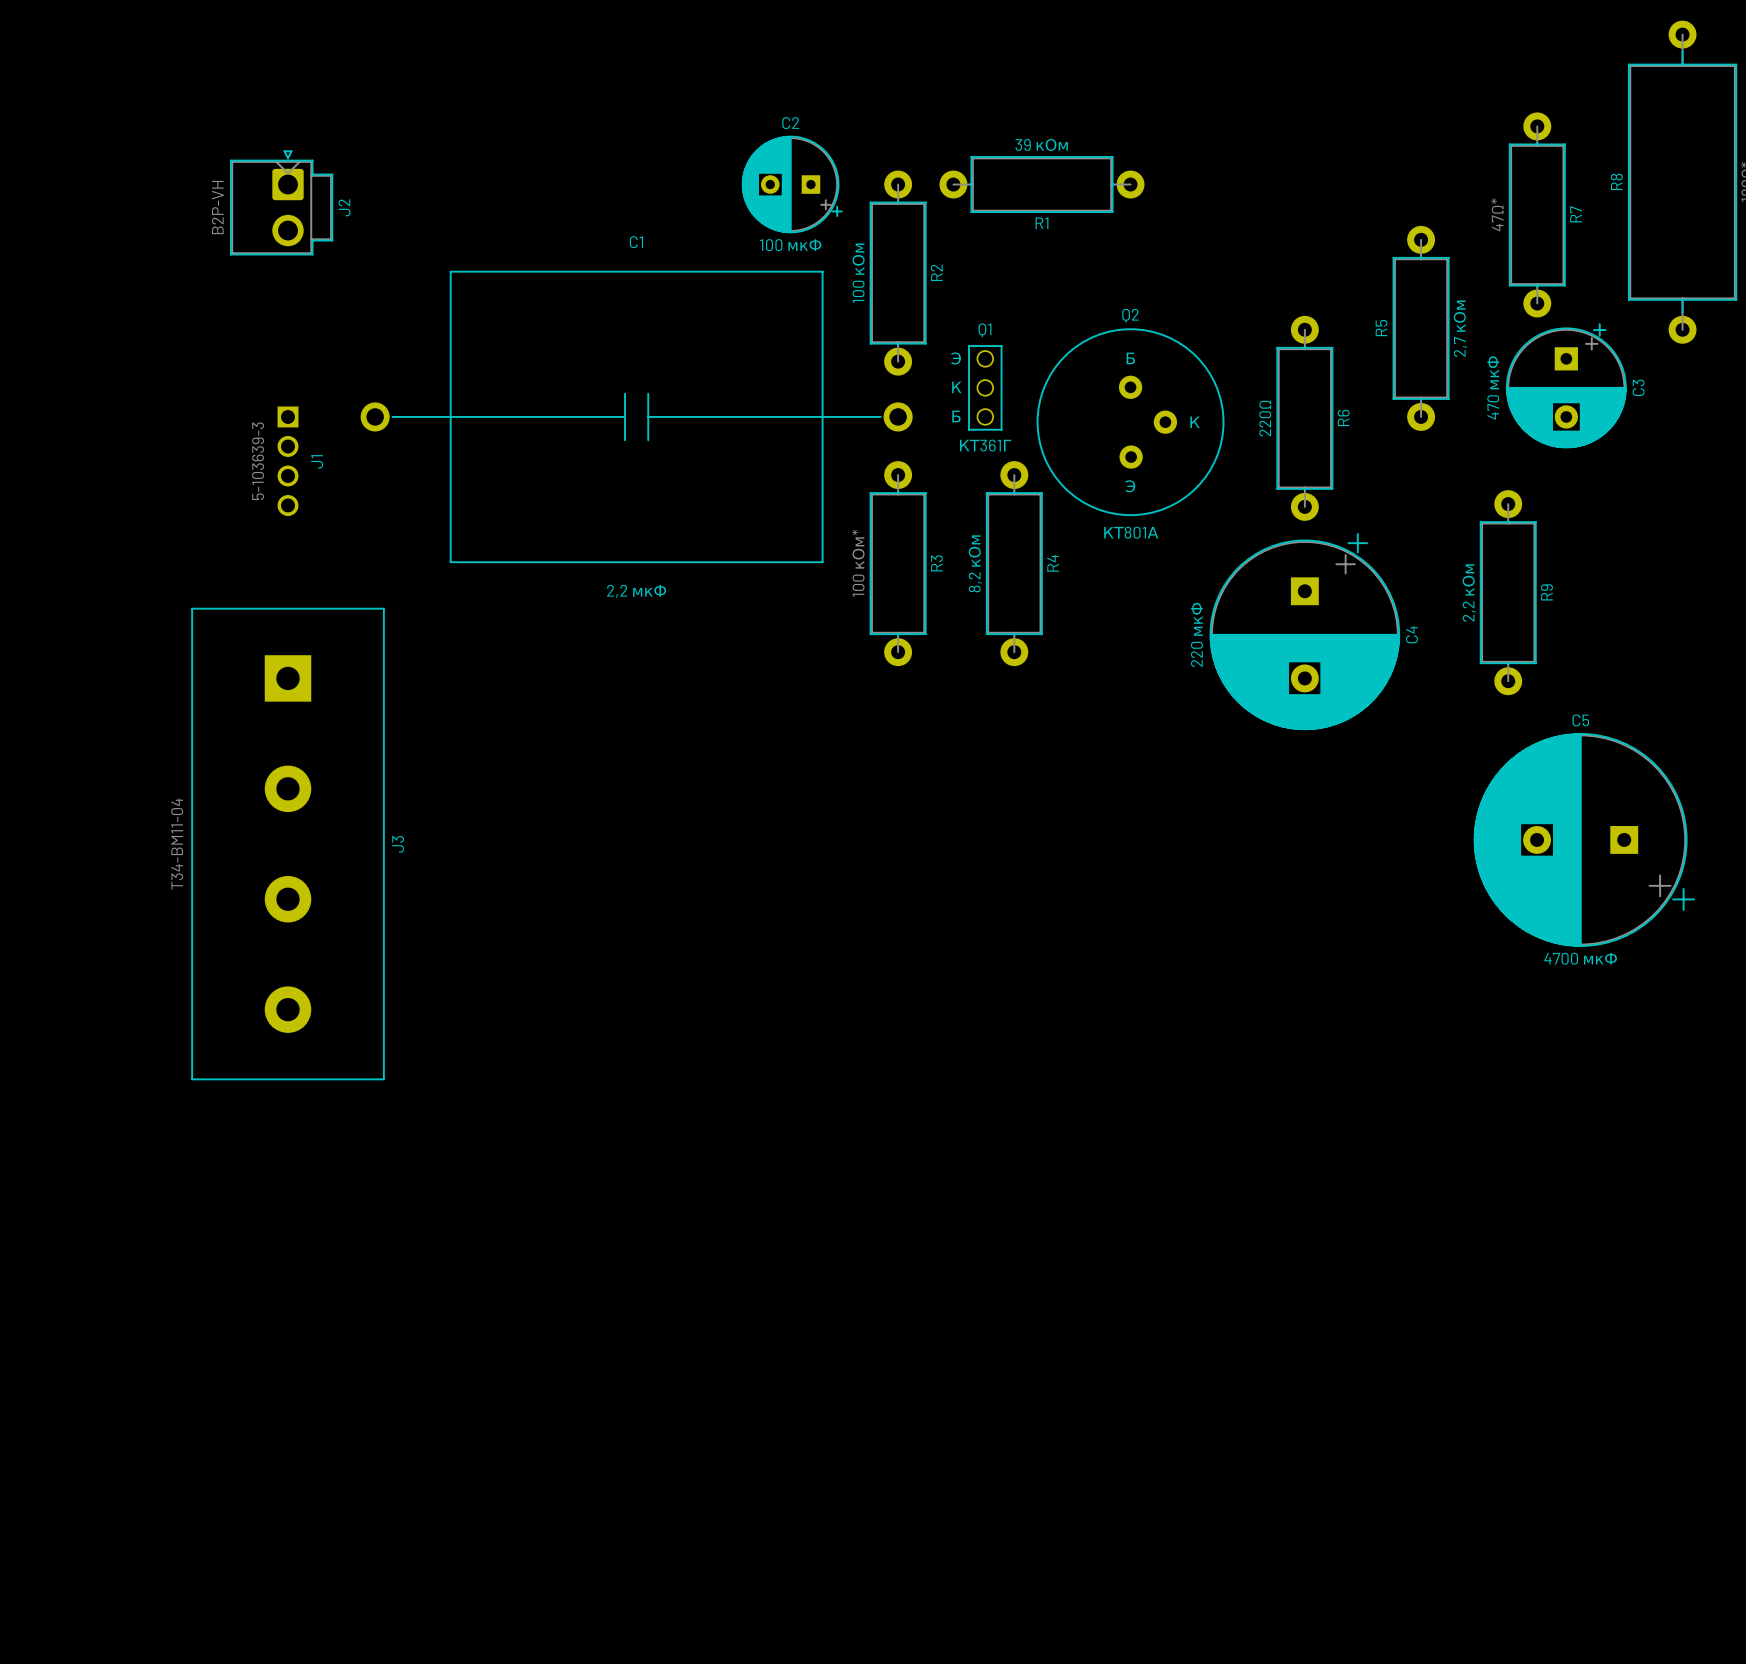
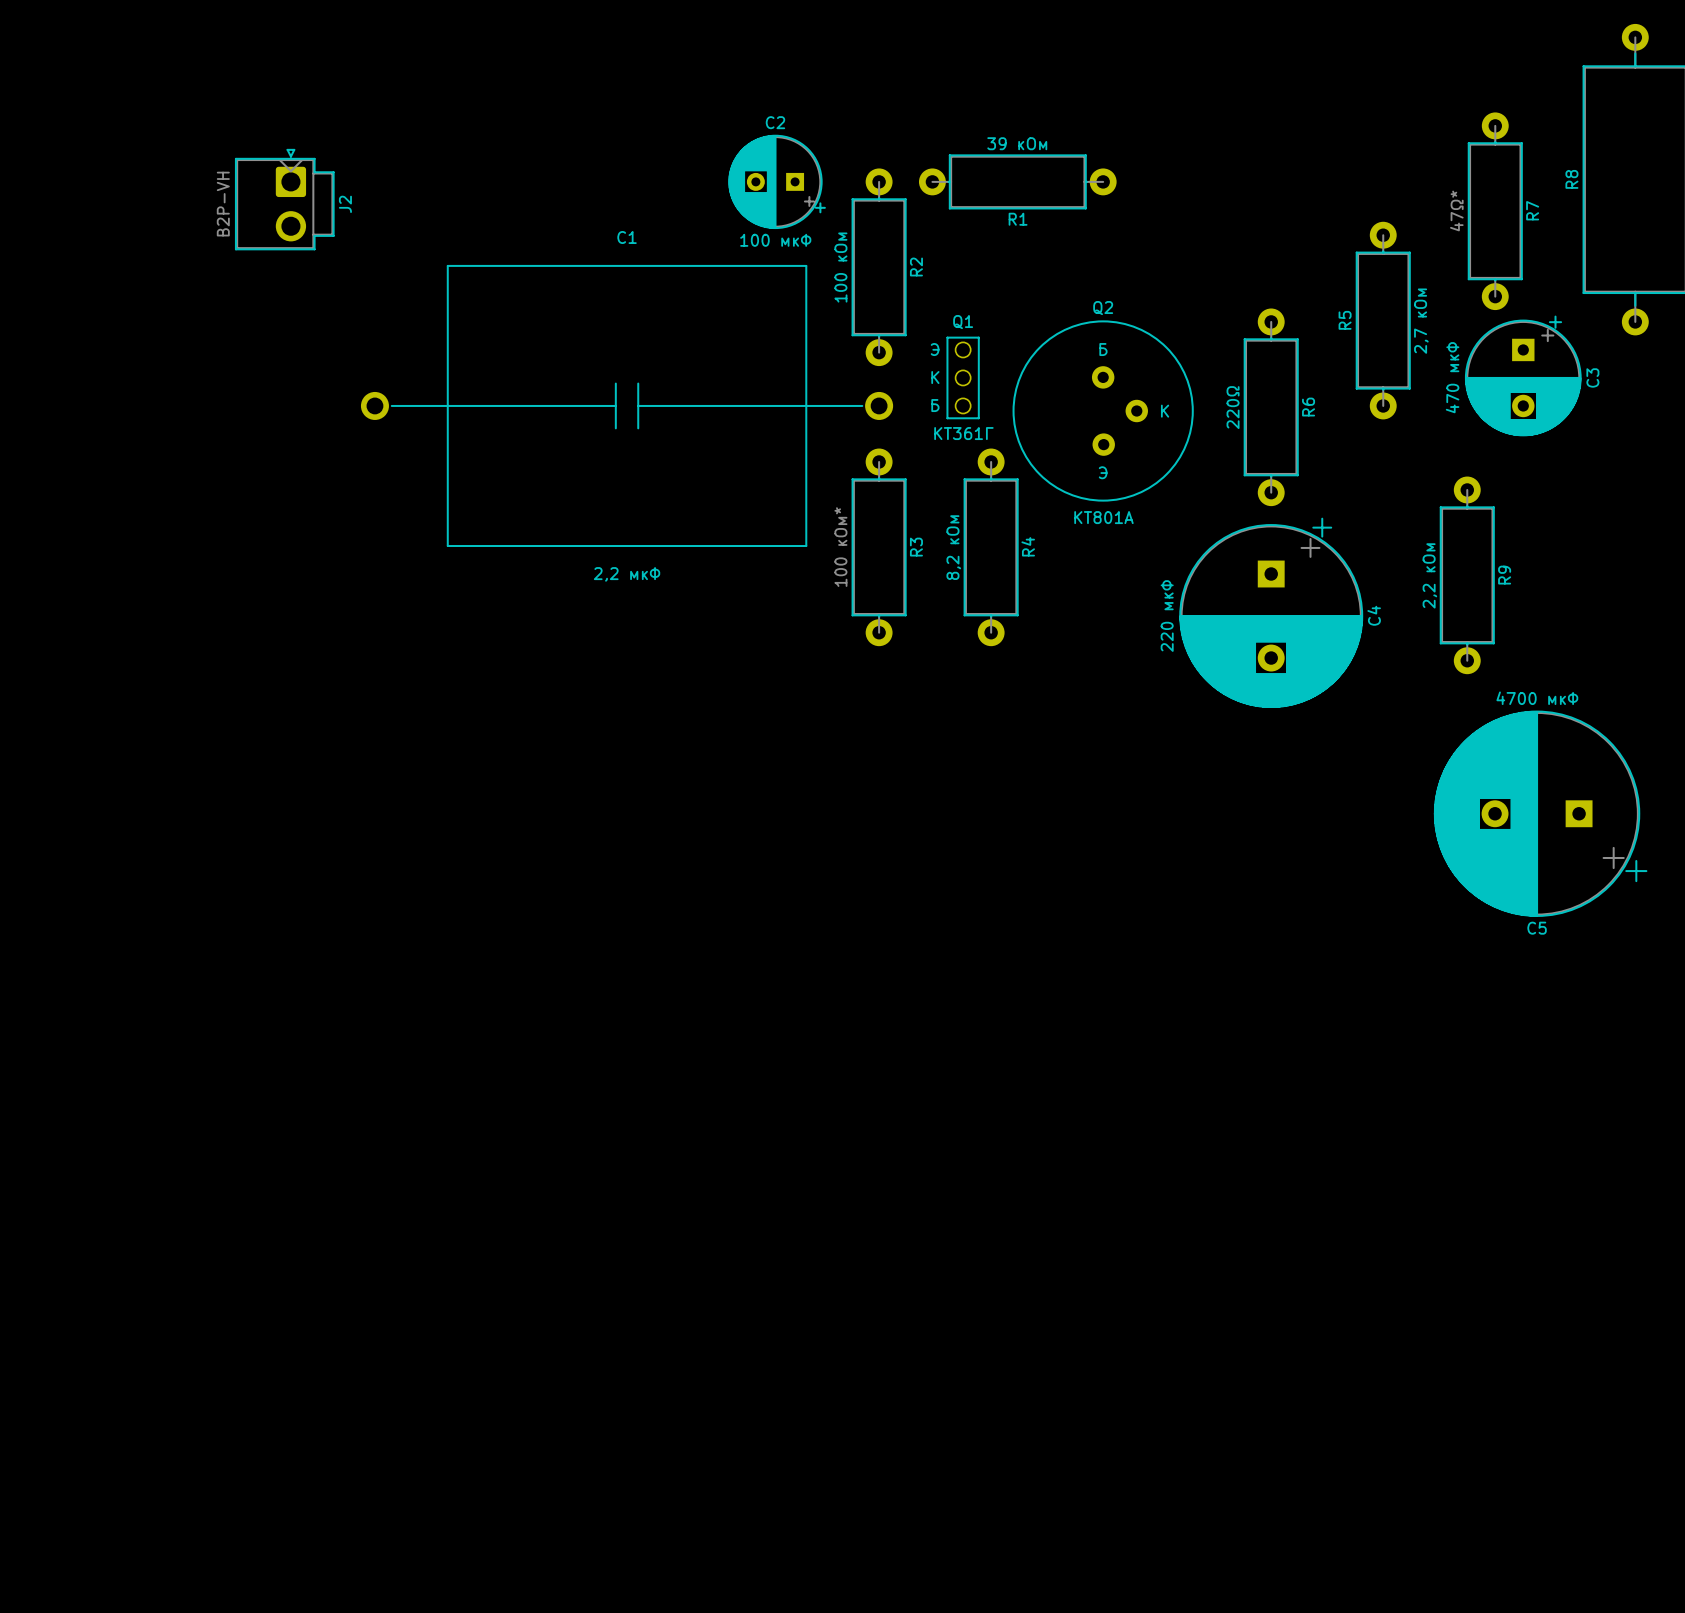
J1: 5-103639-3 (288, 461) -> none
C5 name position: C5 (1580, 720) -> C5 (1537, 928)
J3: T34-BM11-04 (288, 844) -> none
C5 value position: 4700 мкФ (1580, 958) -> 4700 мкФ (1537, 698)

